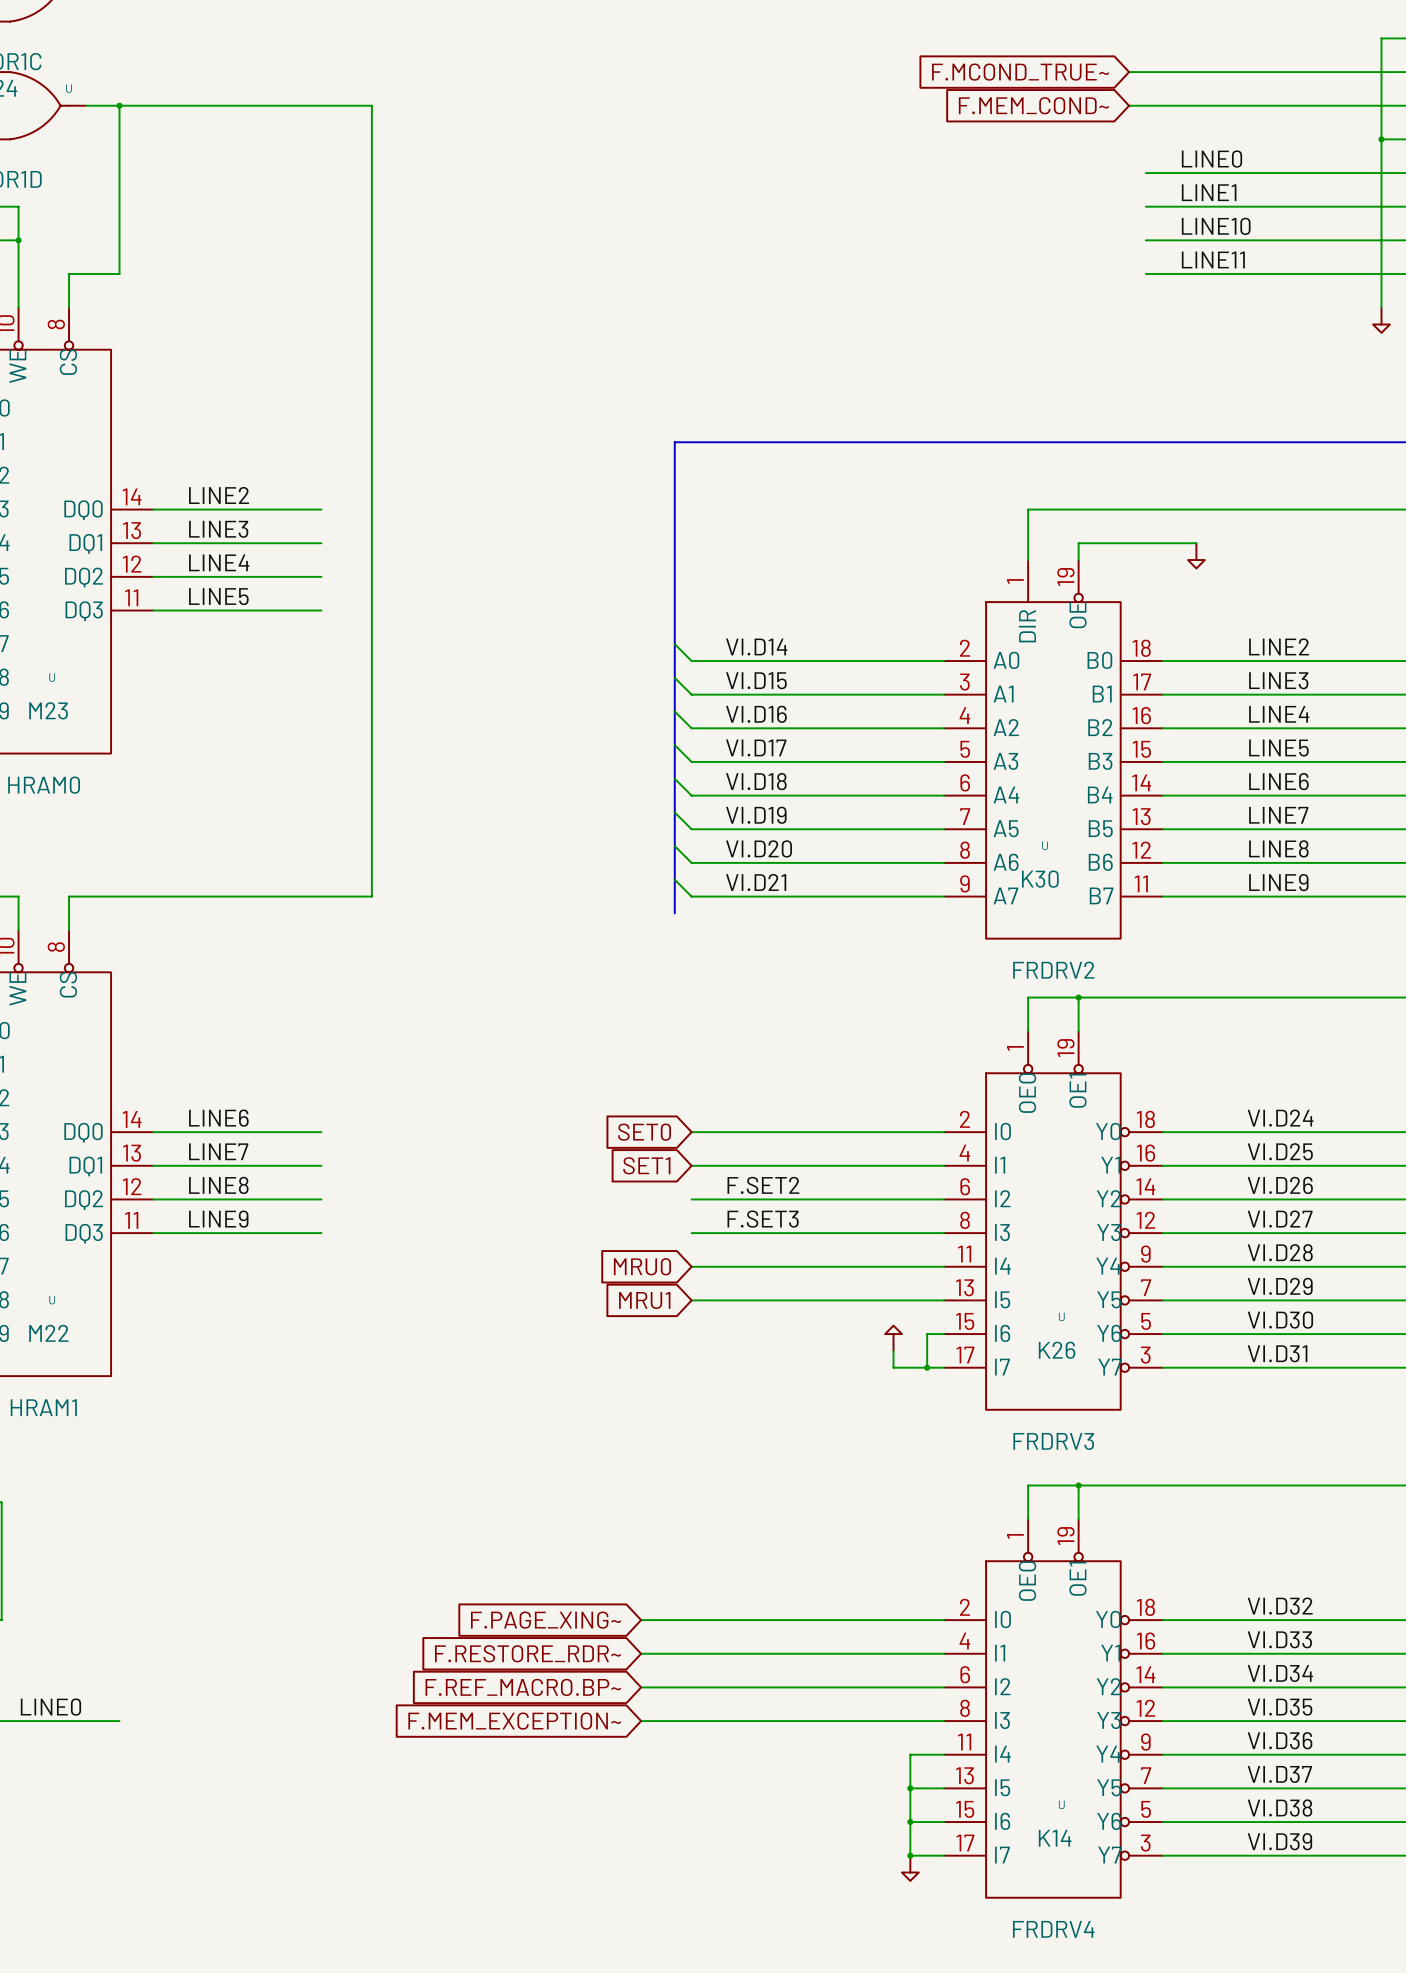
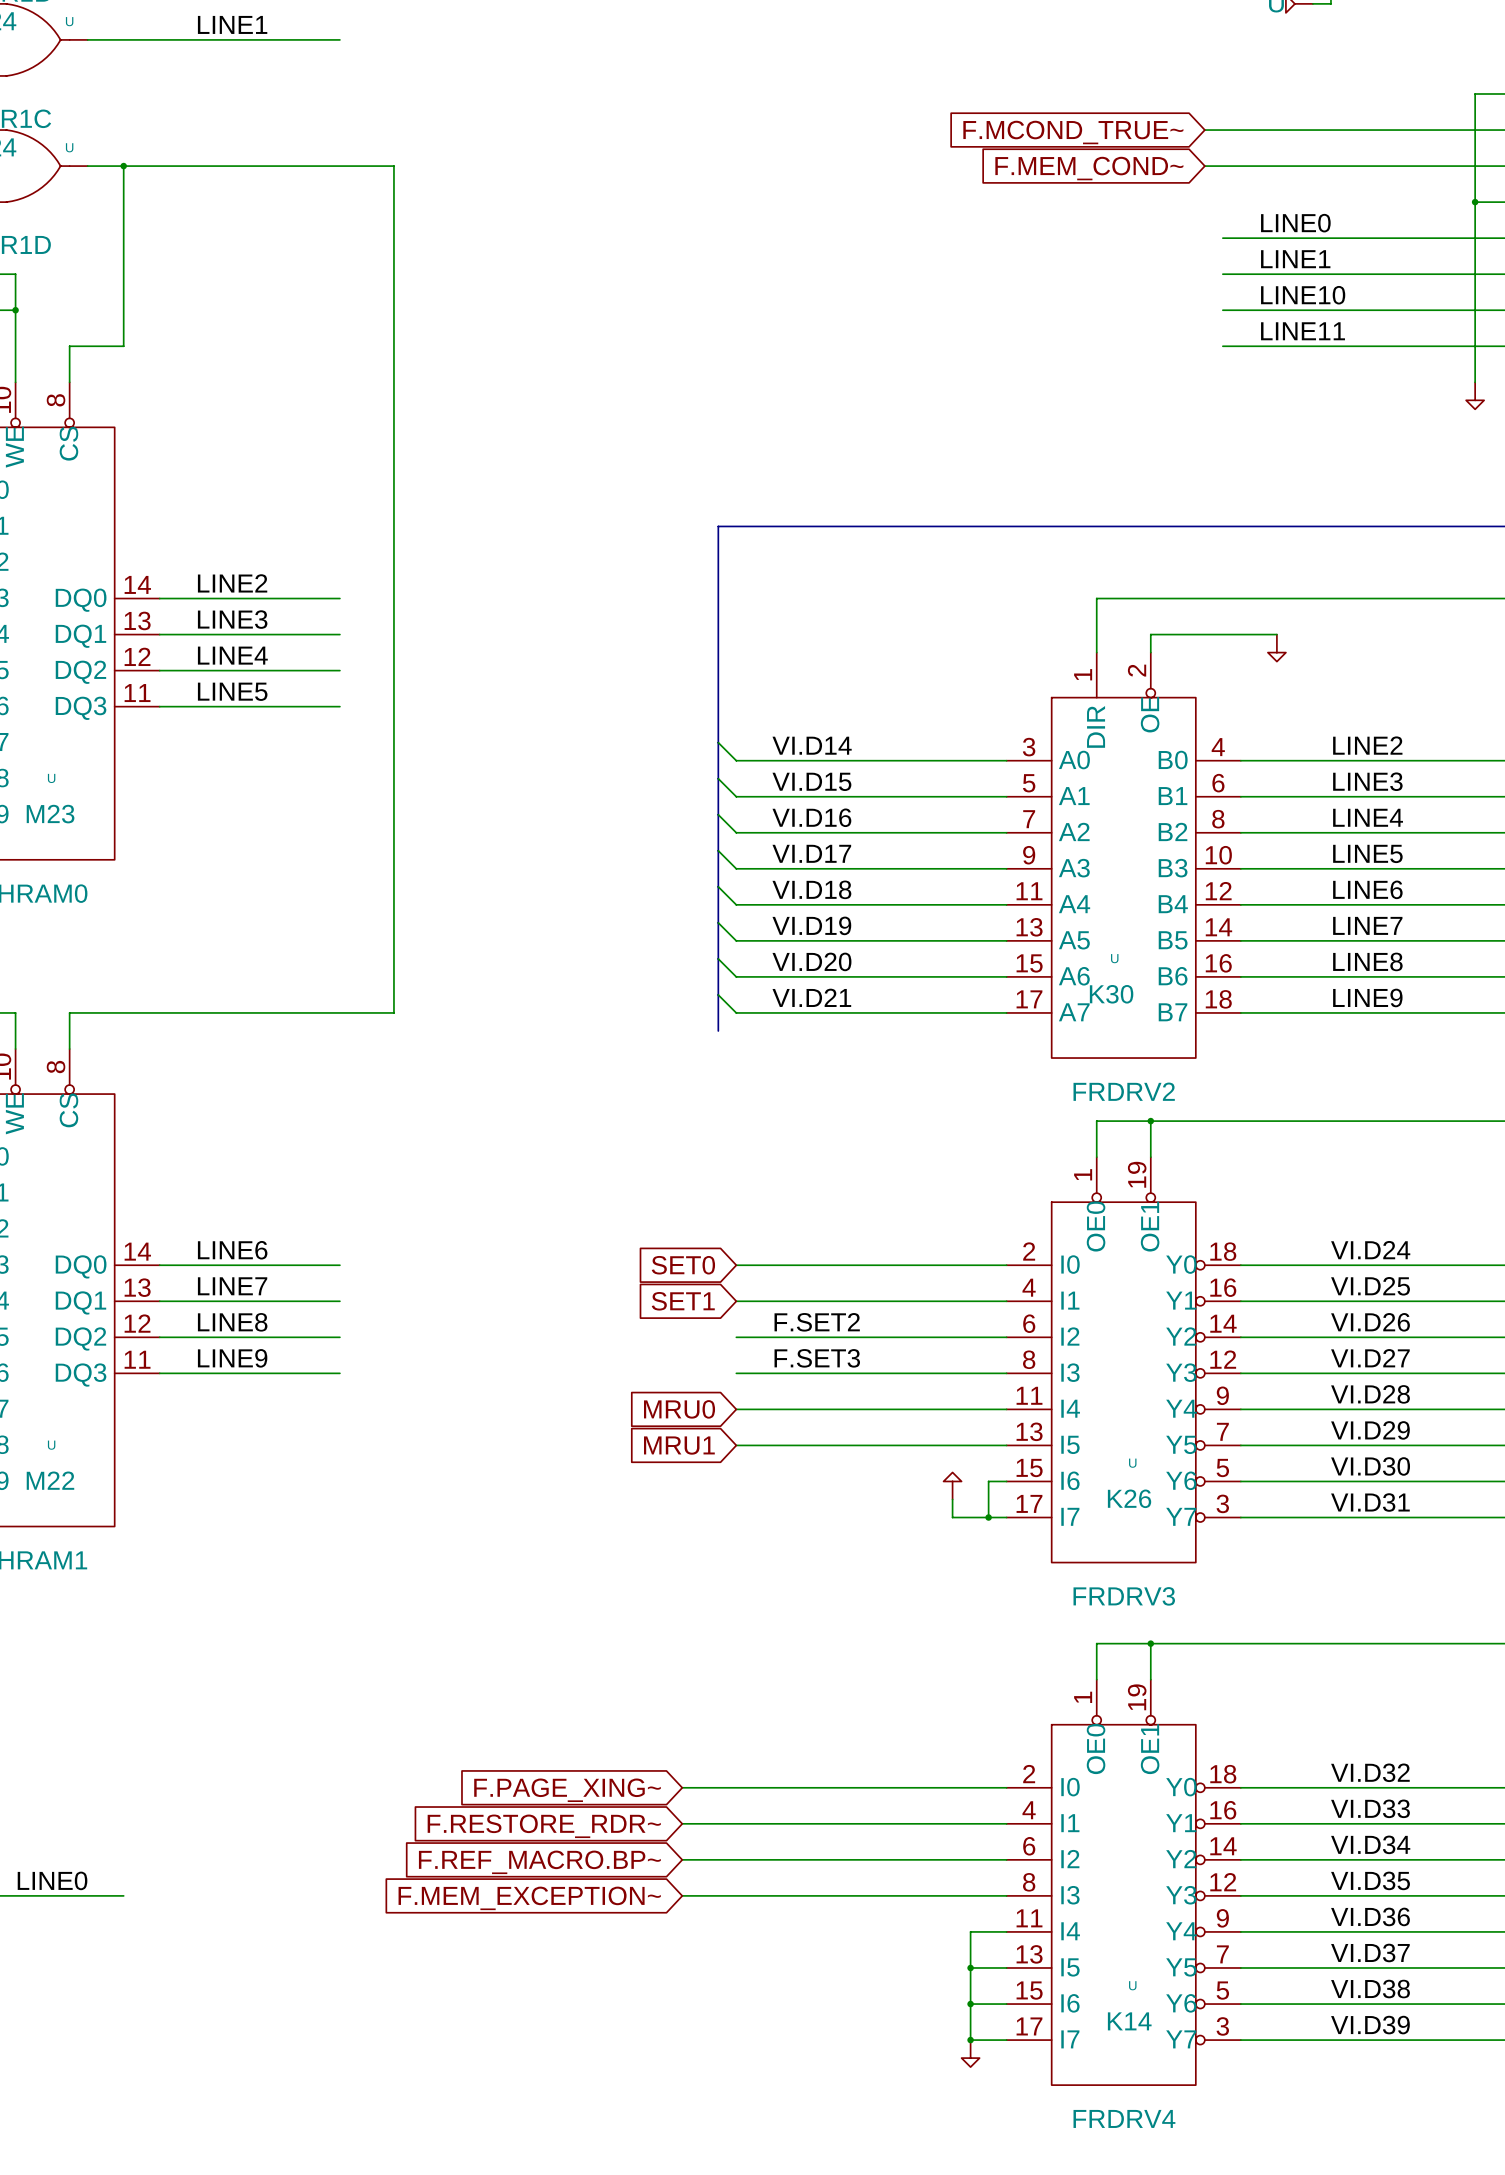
U symbol: [944, 560, 1163, 939] -> [1006, 652, 1241, 1059]

